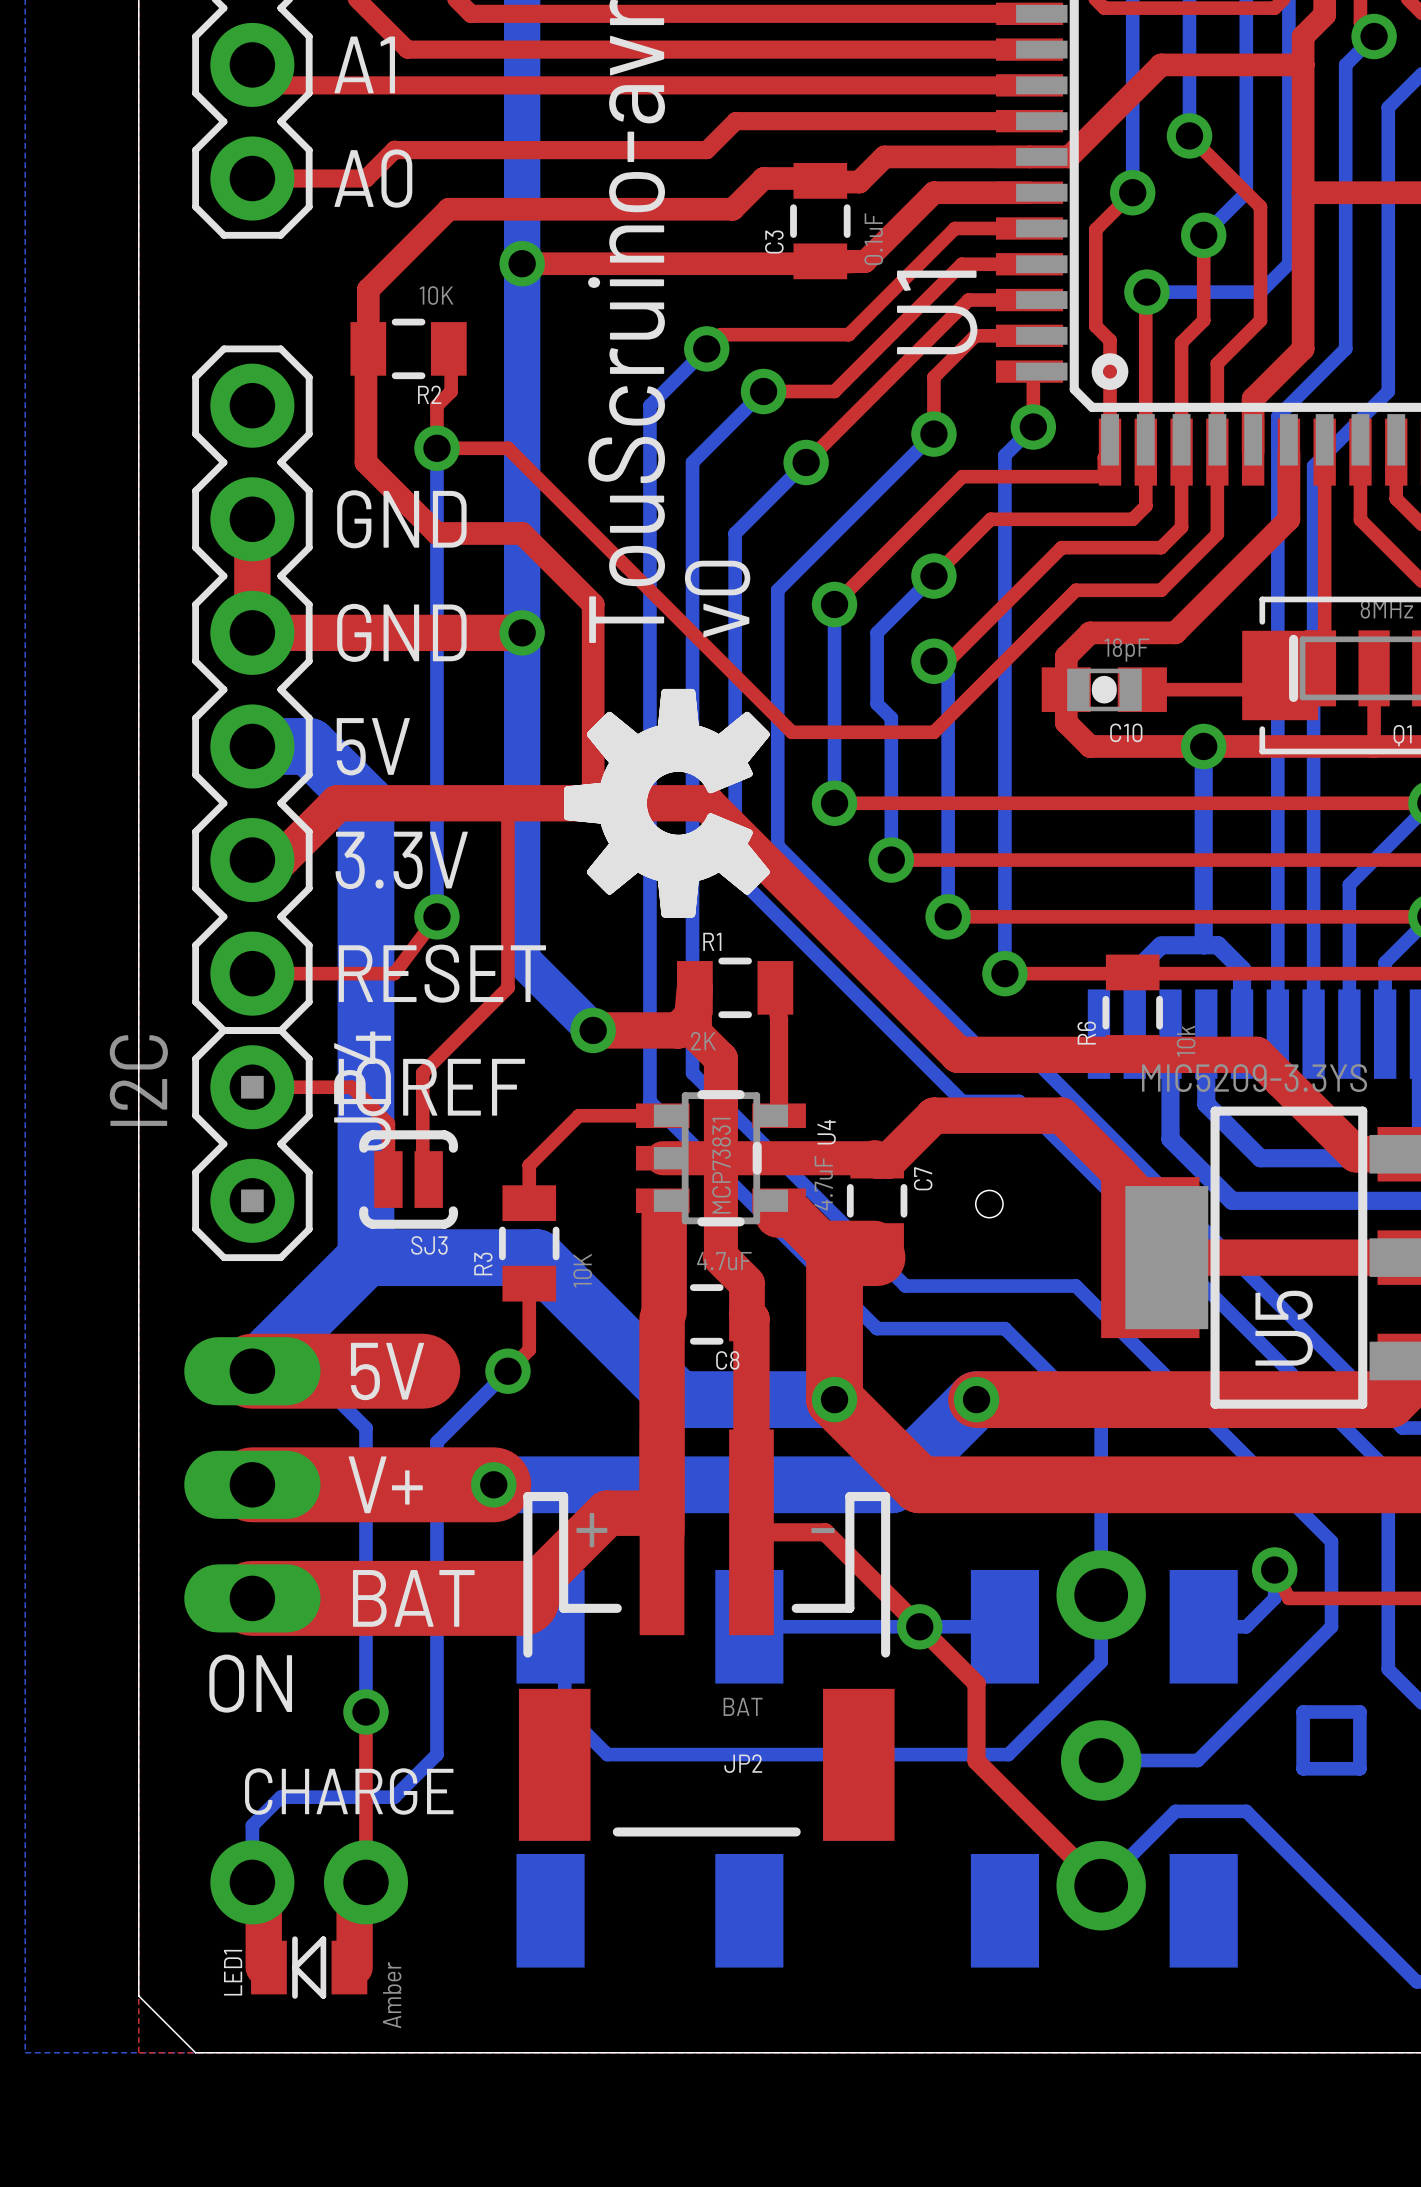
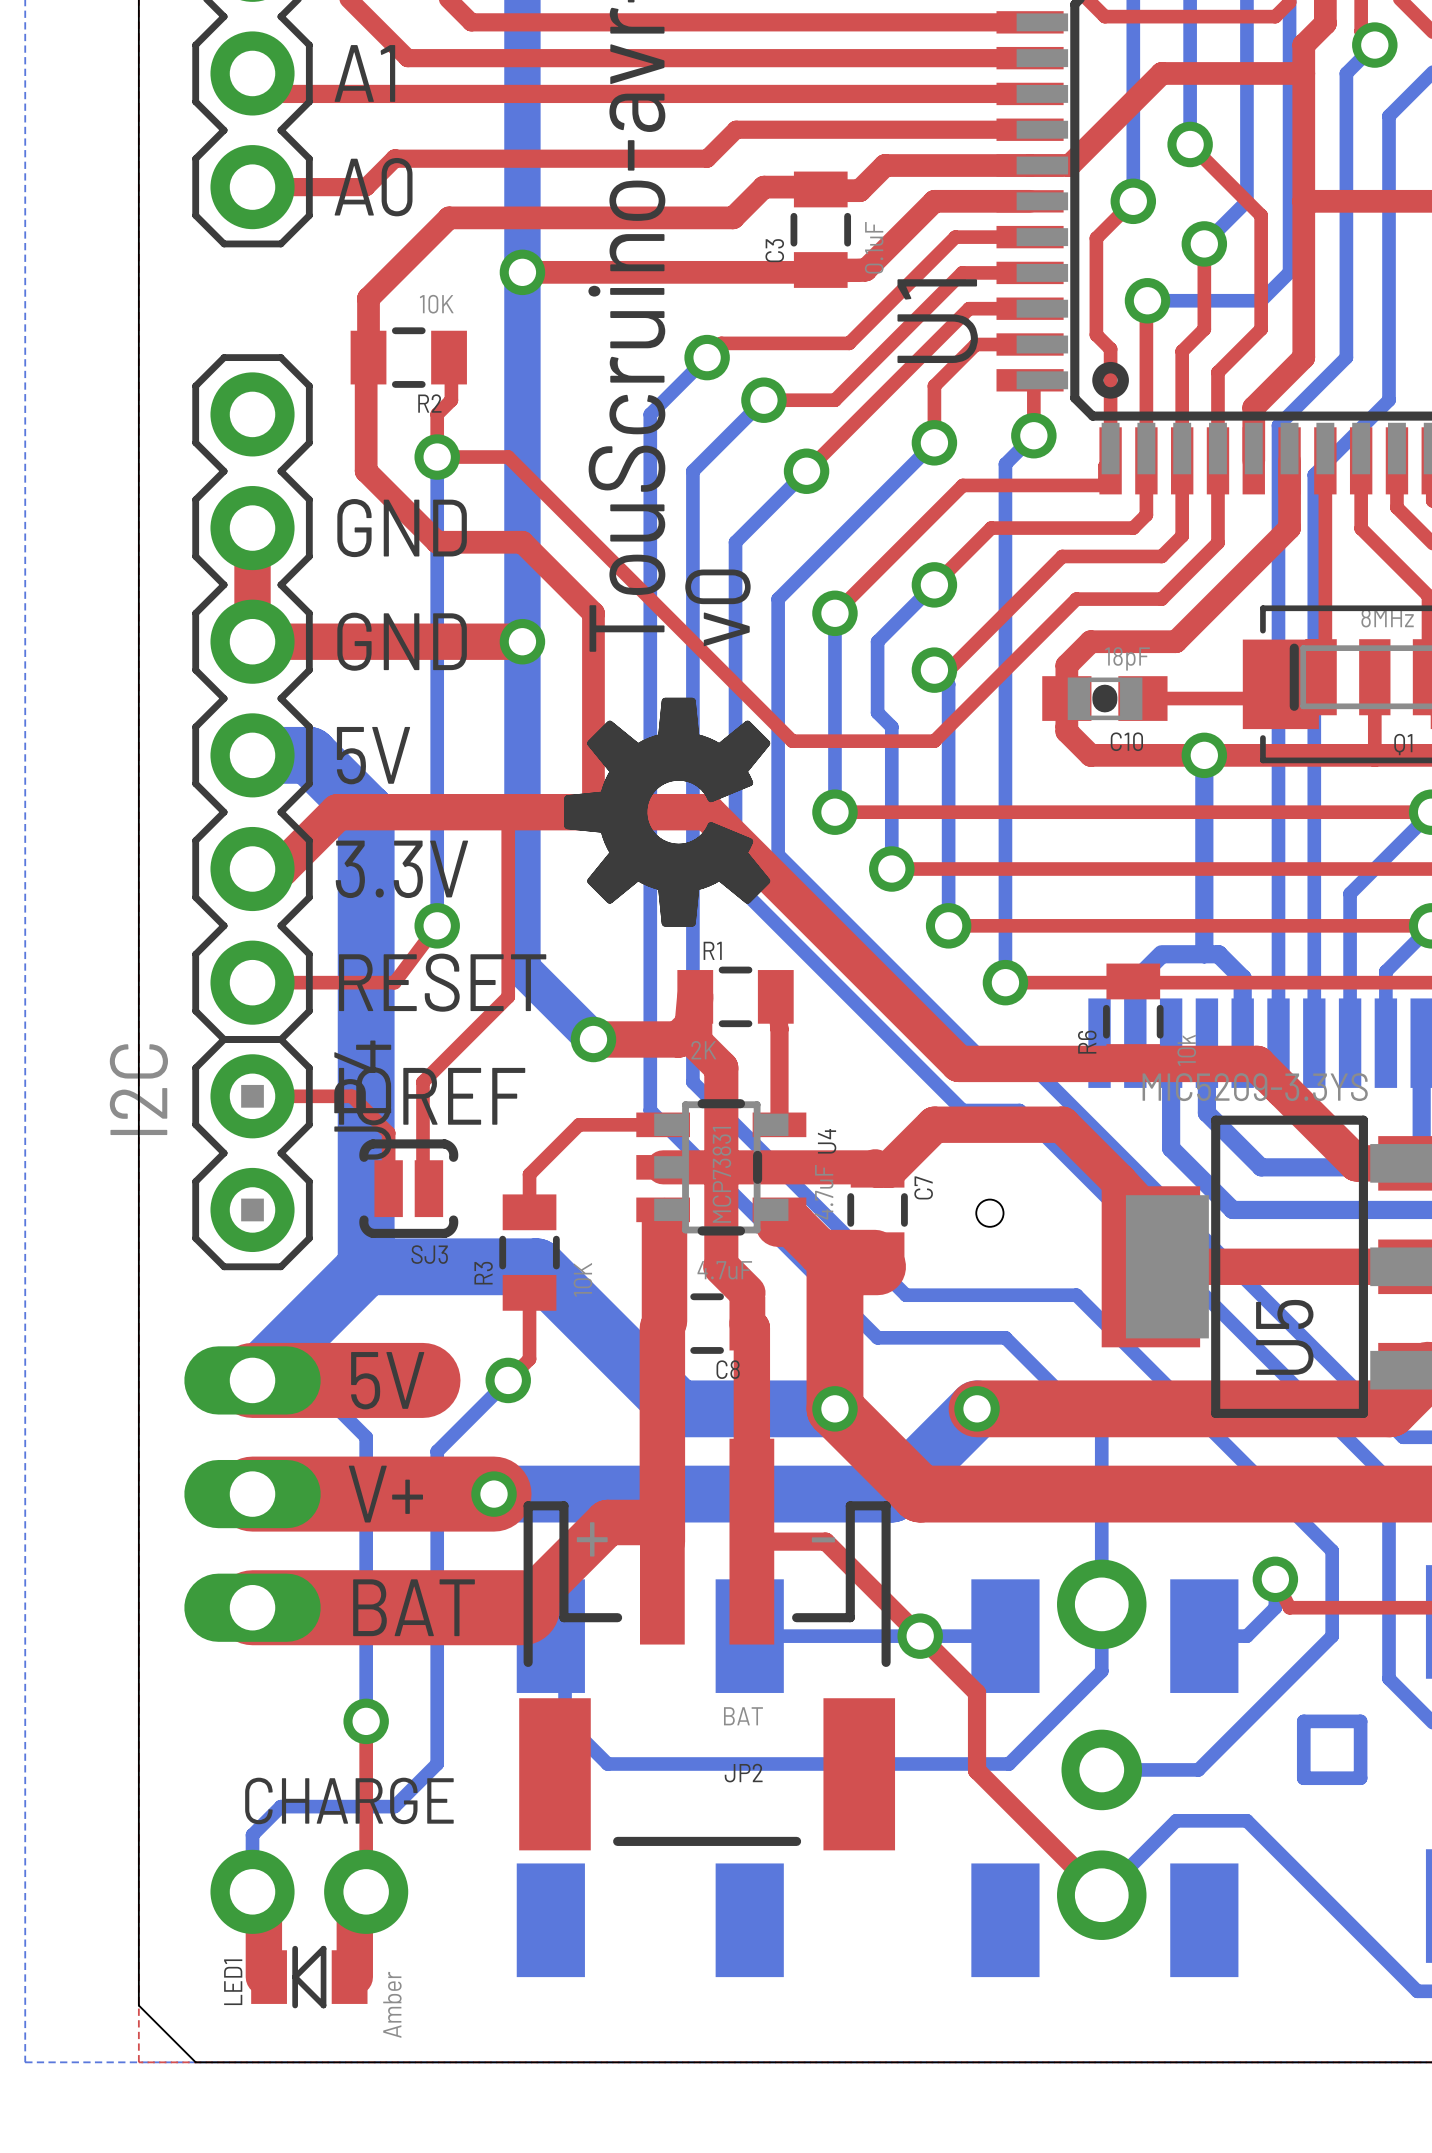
text: ON (250, 1683) -> none

